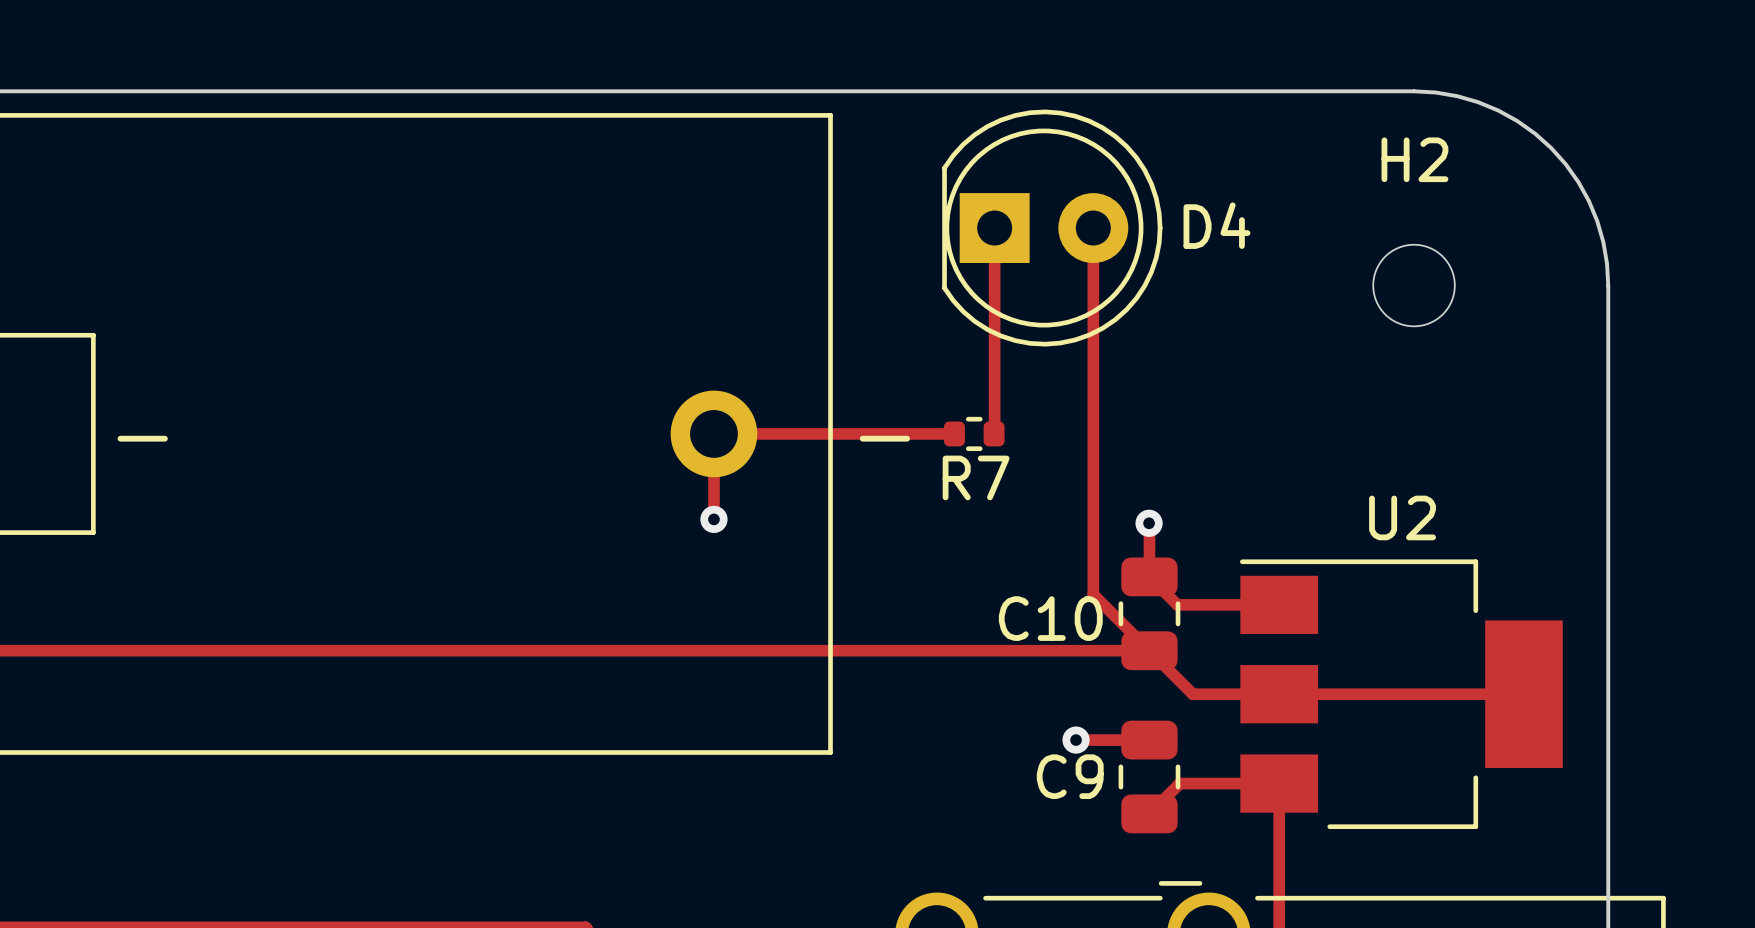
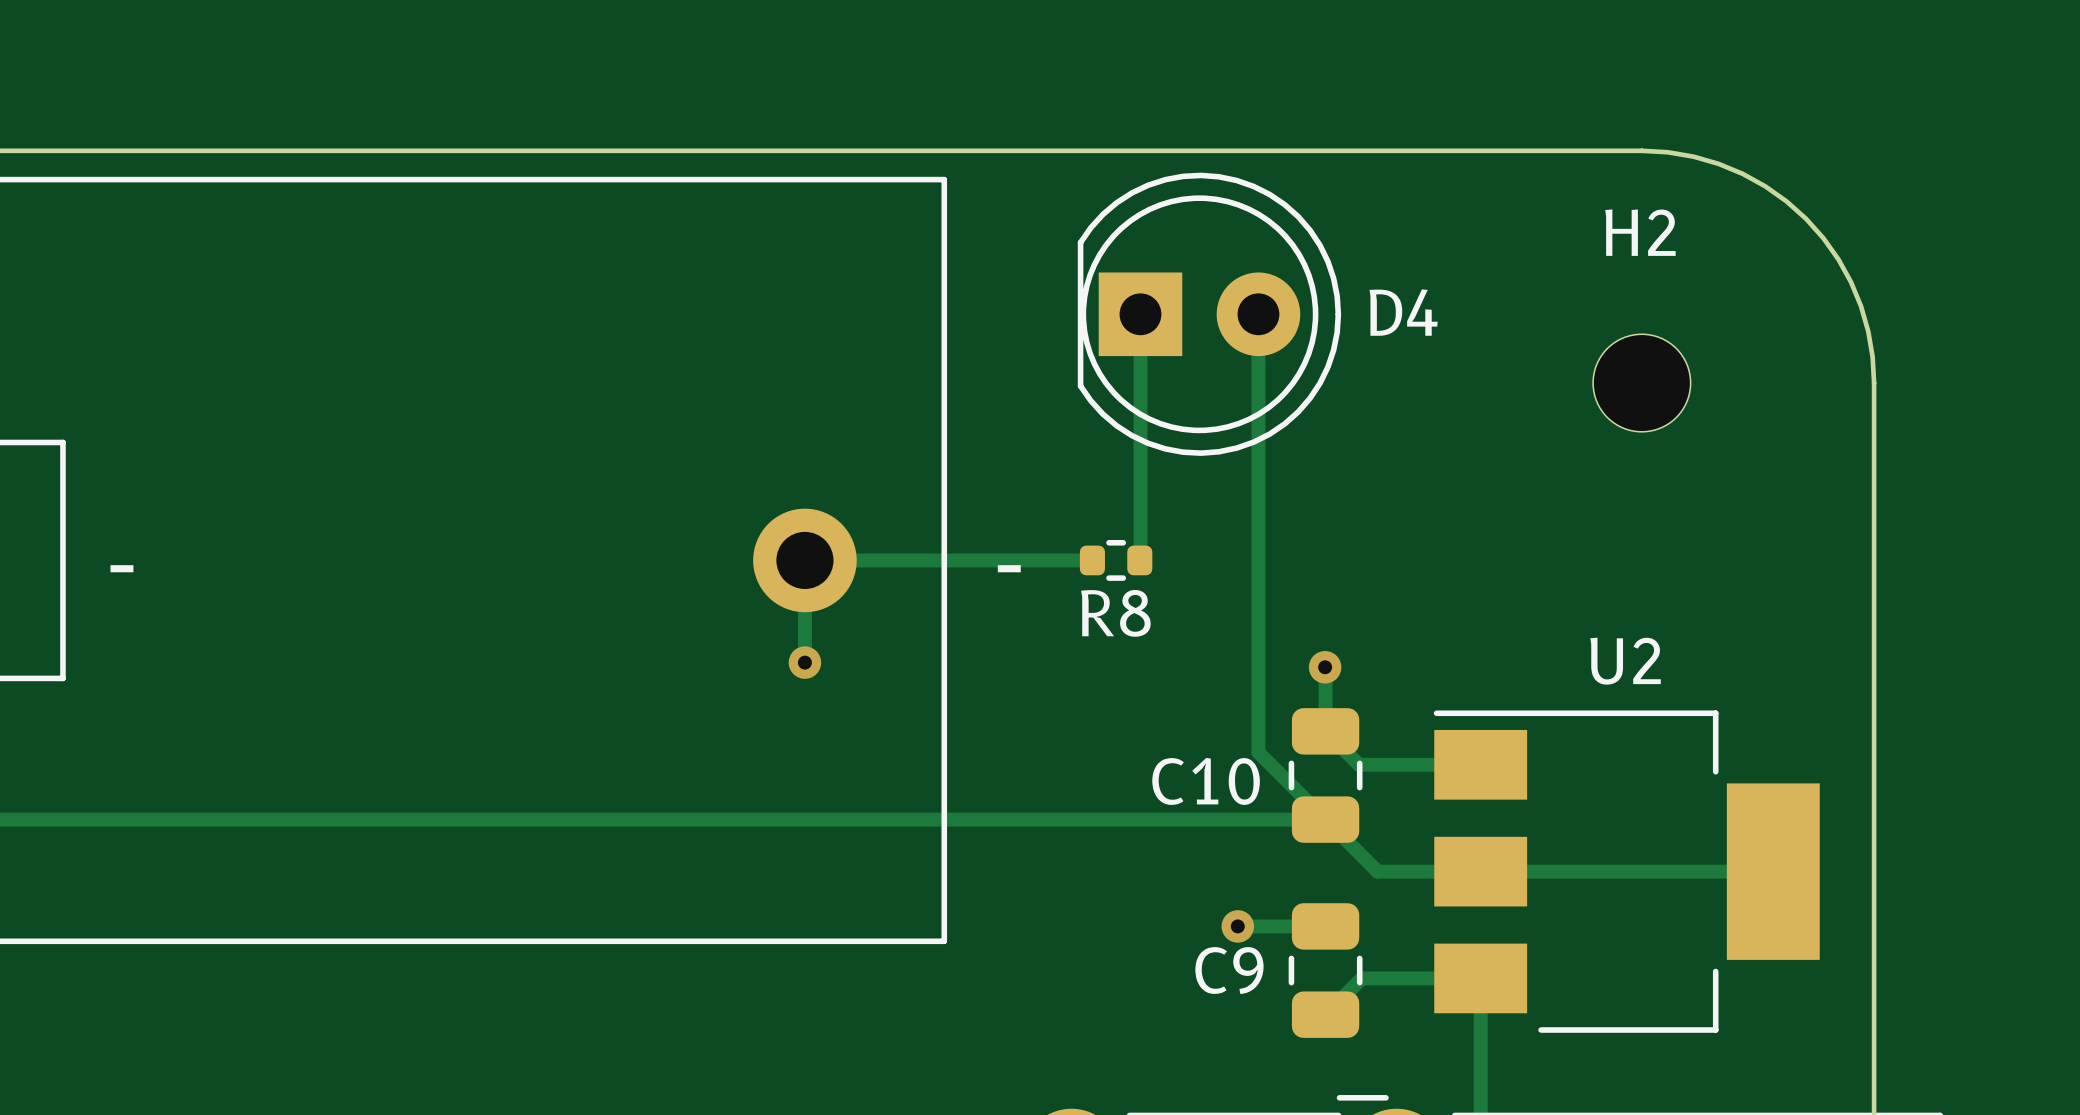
R7 name: R7 (976, 477) -> R8 (1115, 613)

